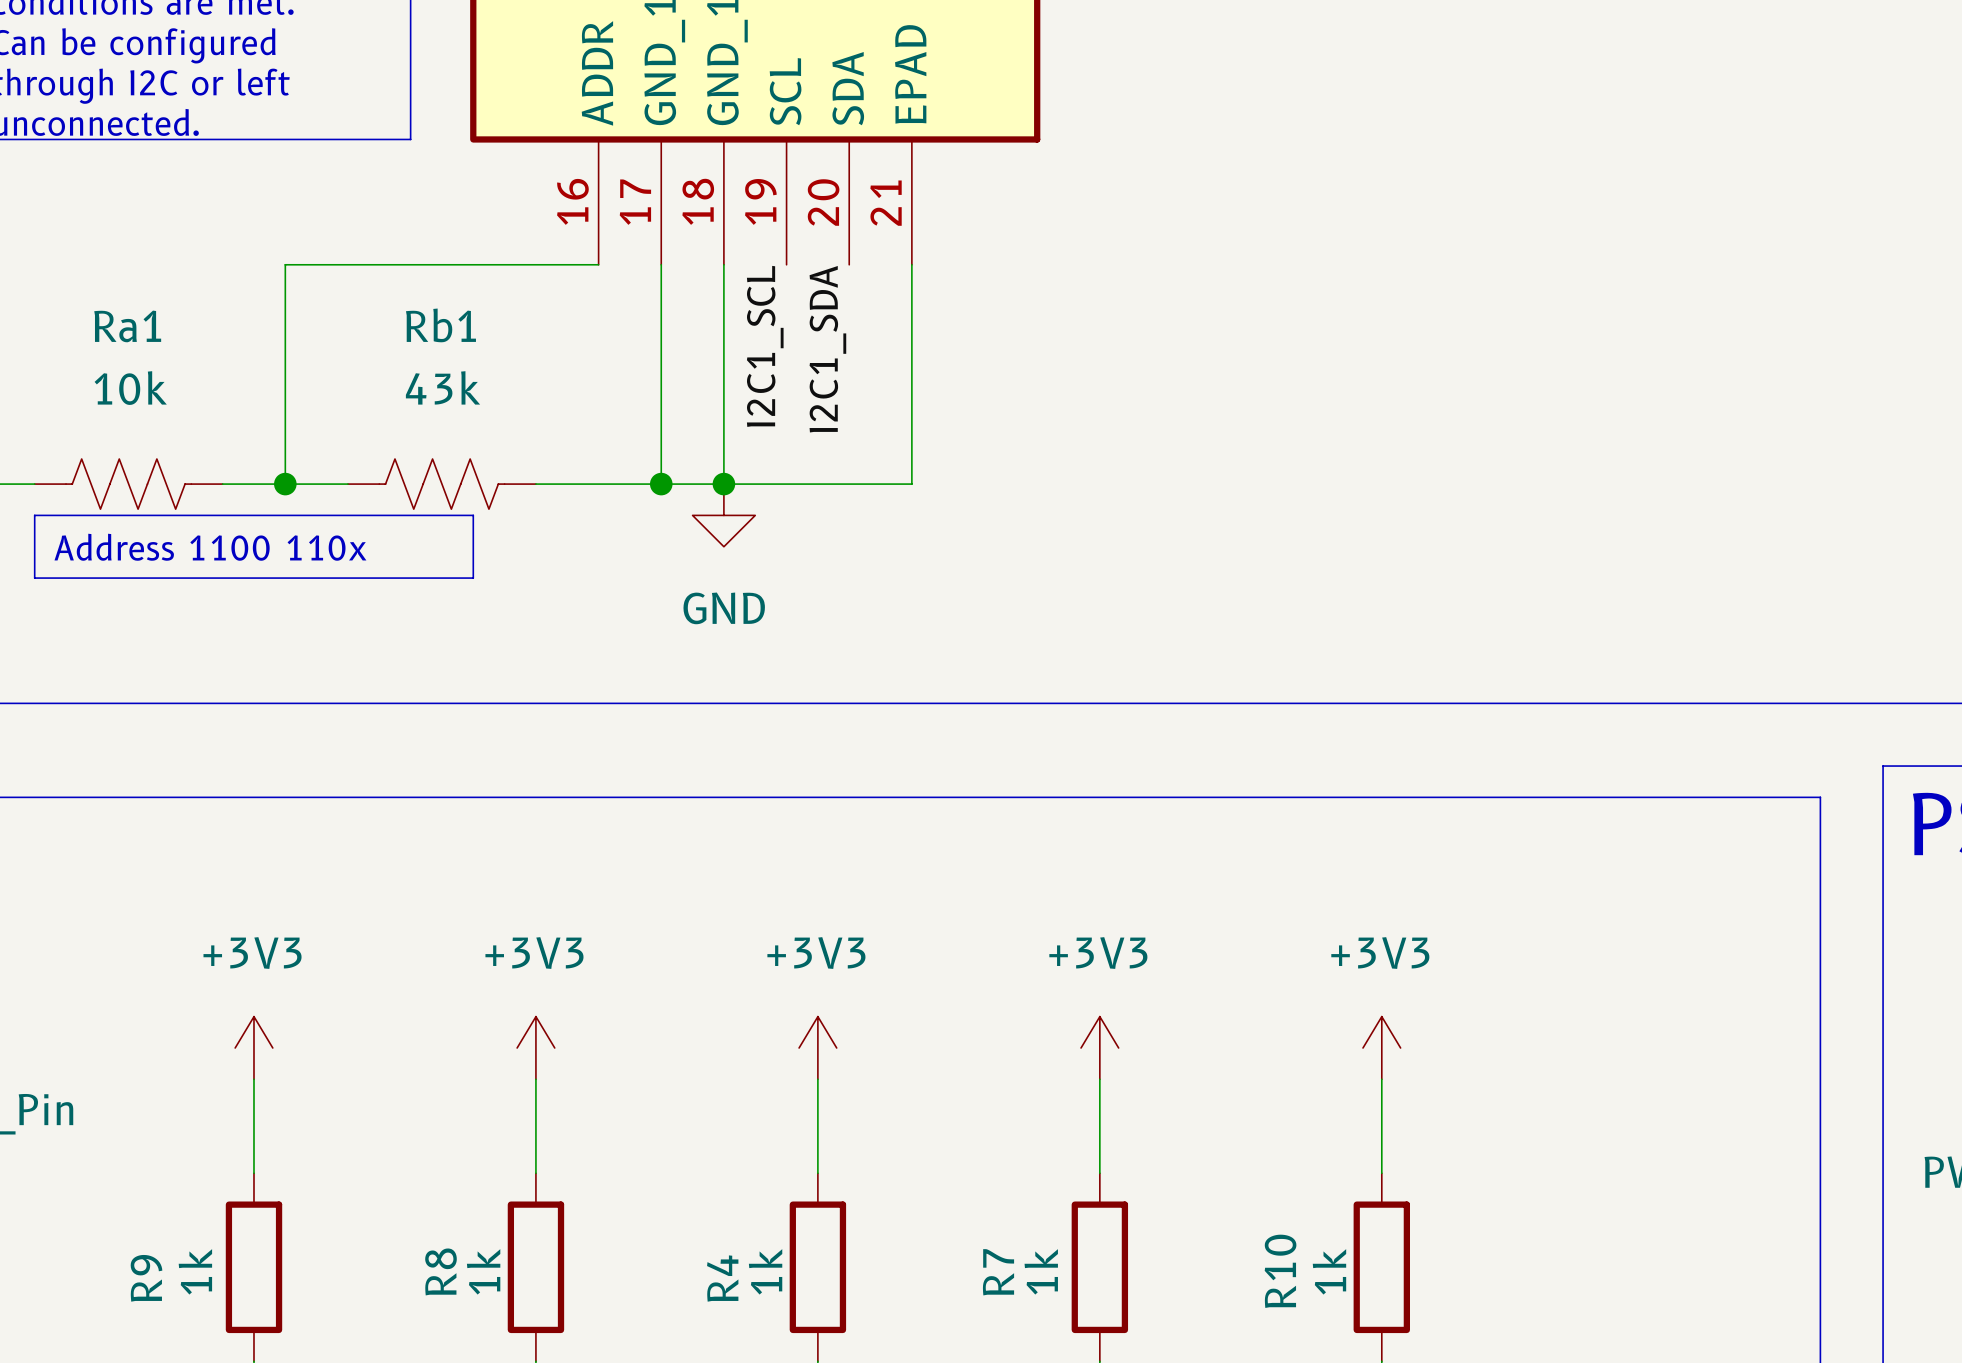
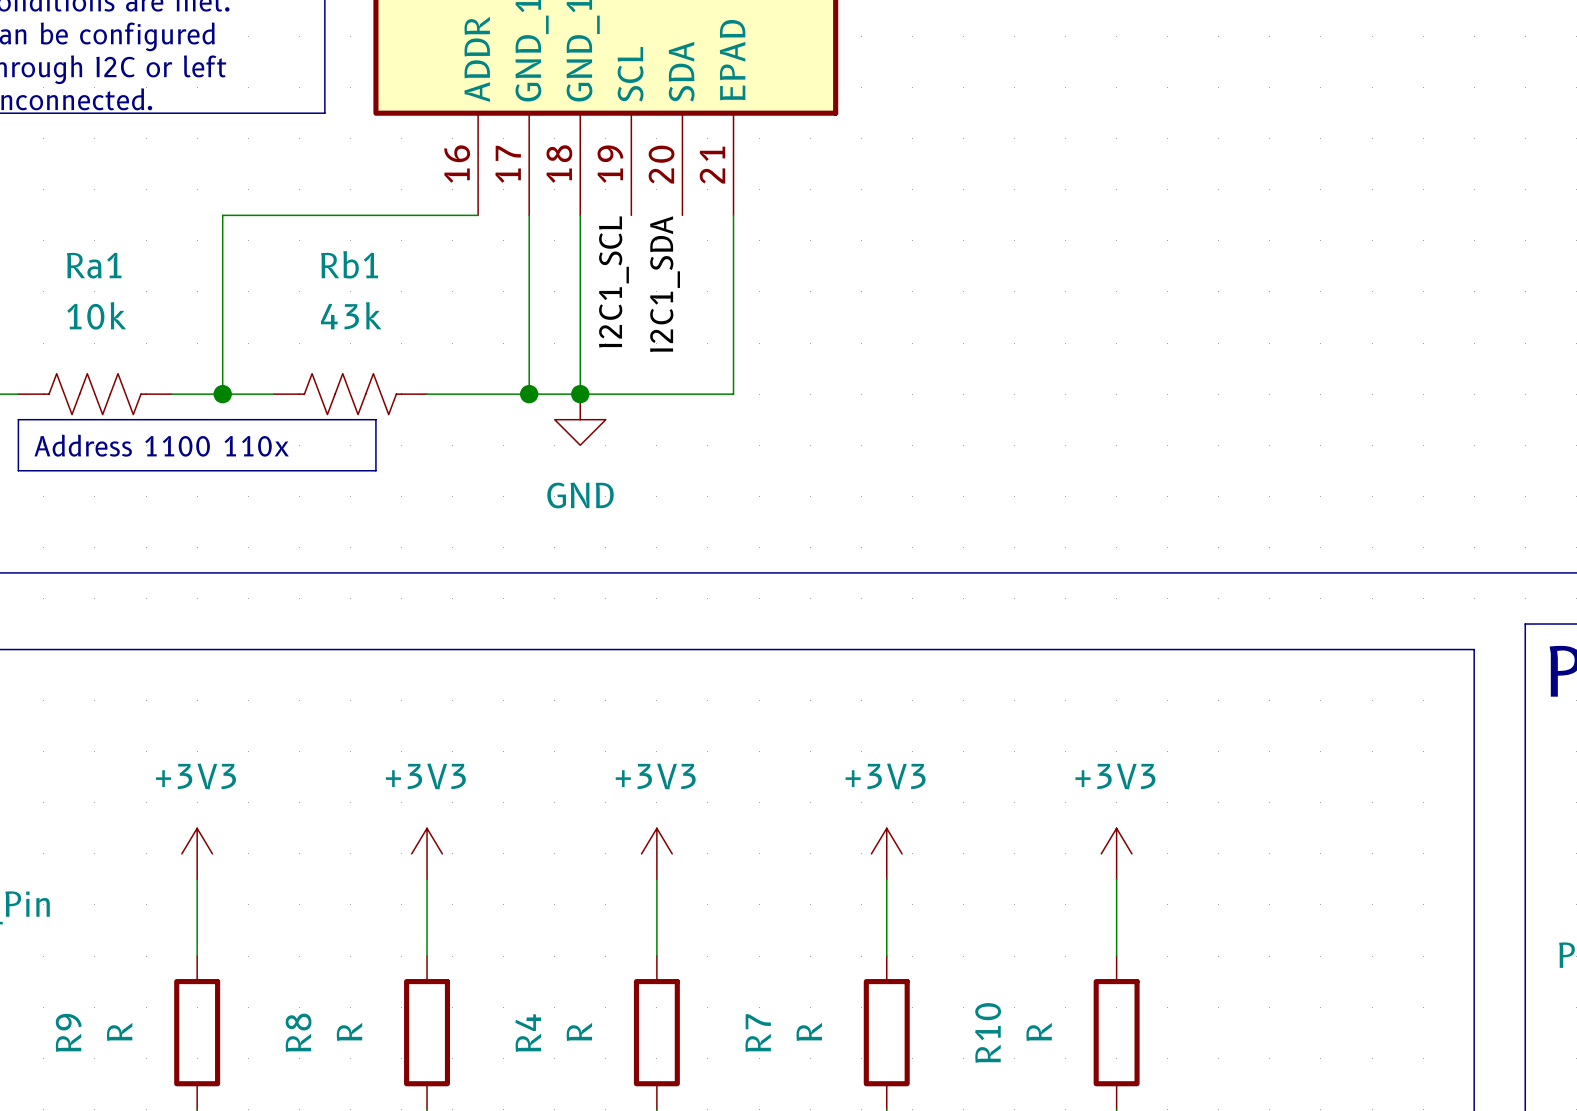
R9 value: 1k (195, 1271) -> R (119, 1031)
R8 name position: R8 (440, 1271) -> R8 (298, 1032)
R8 value: 1k (483, 1271) -> R (349, 1031)
R4 value: 1k (765, 1271) -> R (579, 1031)
R7 value: 1k (1041, 1271) -> R (809, 1031)
R10 name position: R10 (1280, 1271) -> R10 (988, 1032)
R10 value: 1k (1329, 1271) -> R (1039, 1031)
R7 name position: R7 (998, 1272) -> R7 (758, 1033)
R9 name position: R9 (146, 1278) -> R9 (68, 1032)
R4 name position: R4 (722, 1278) -> R4 (528, 1033)

